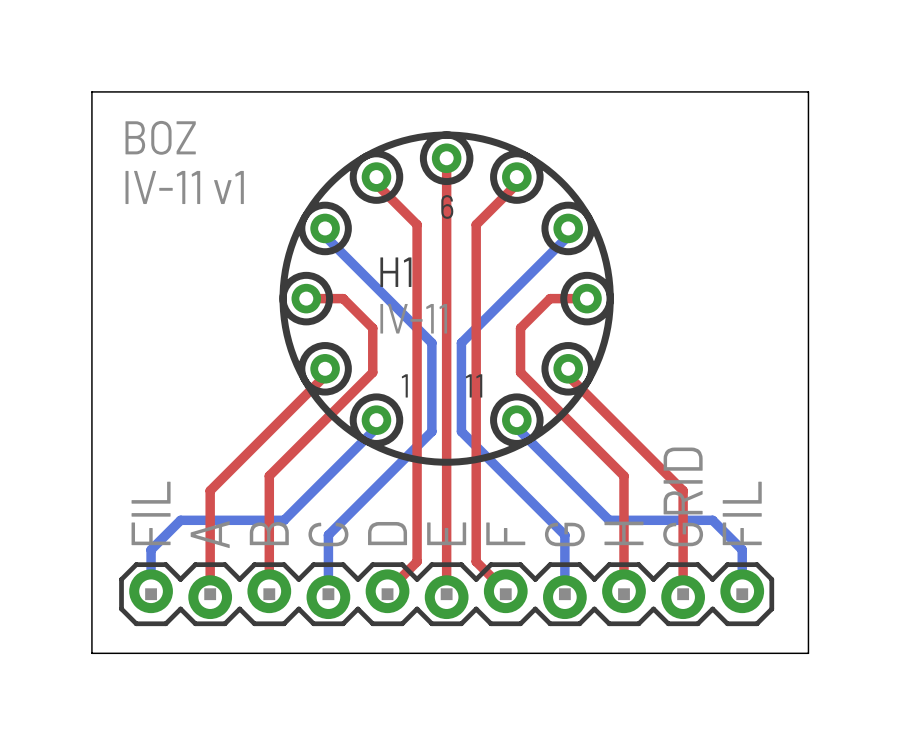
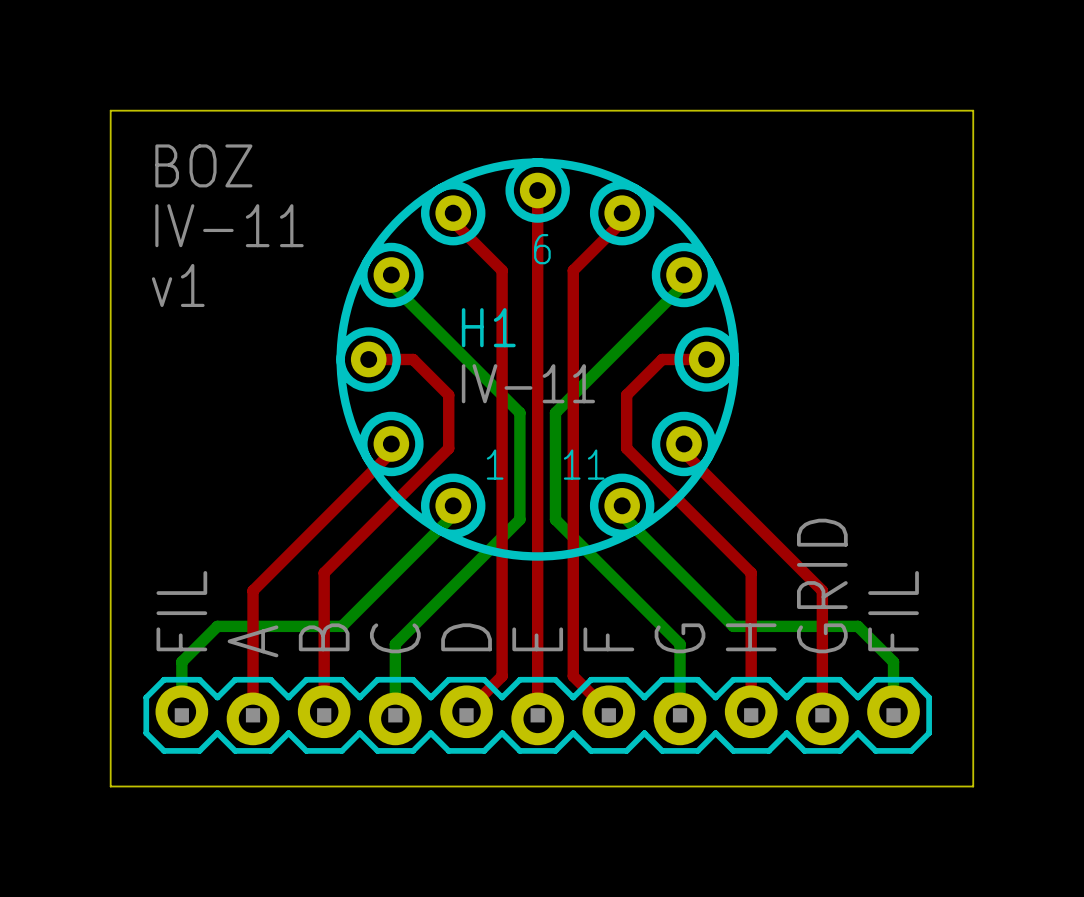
text: IV-11 v1 (184, 187) -> IV-11 (229, 225)
text: none -> v1 (178, 285)

